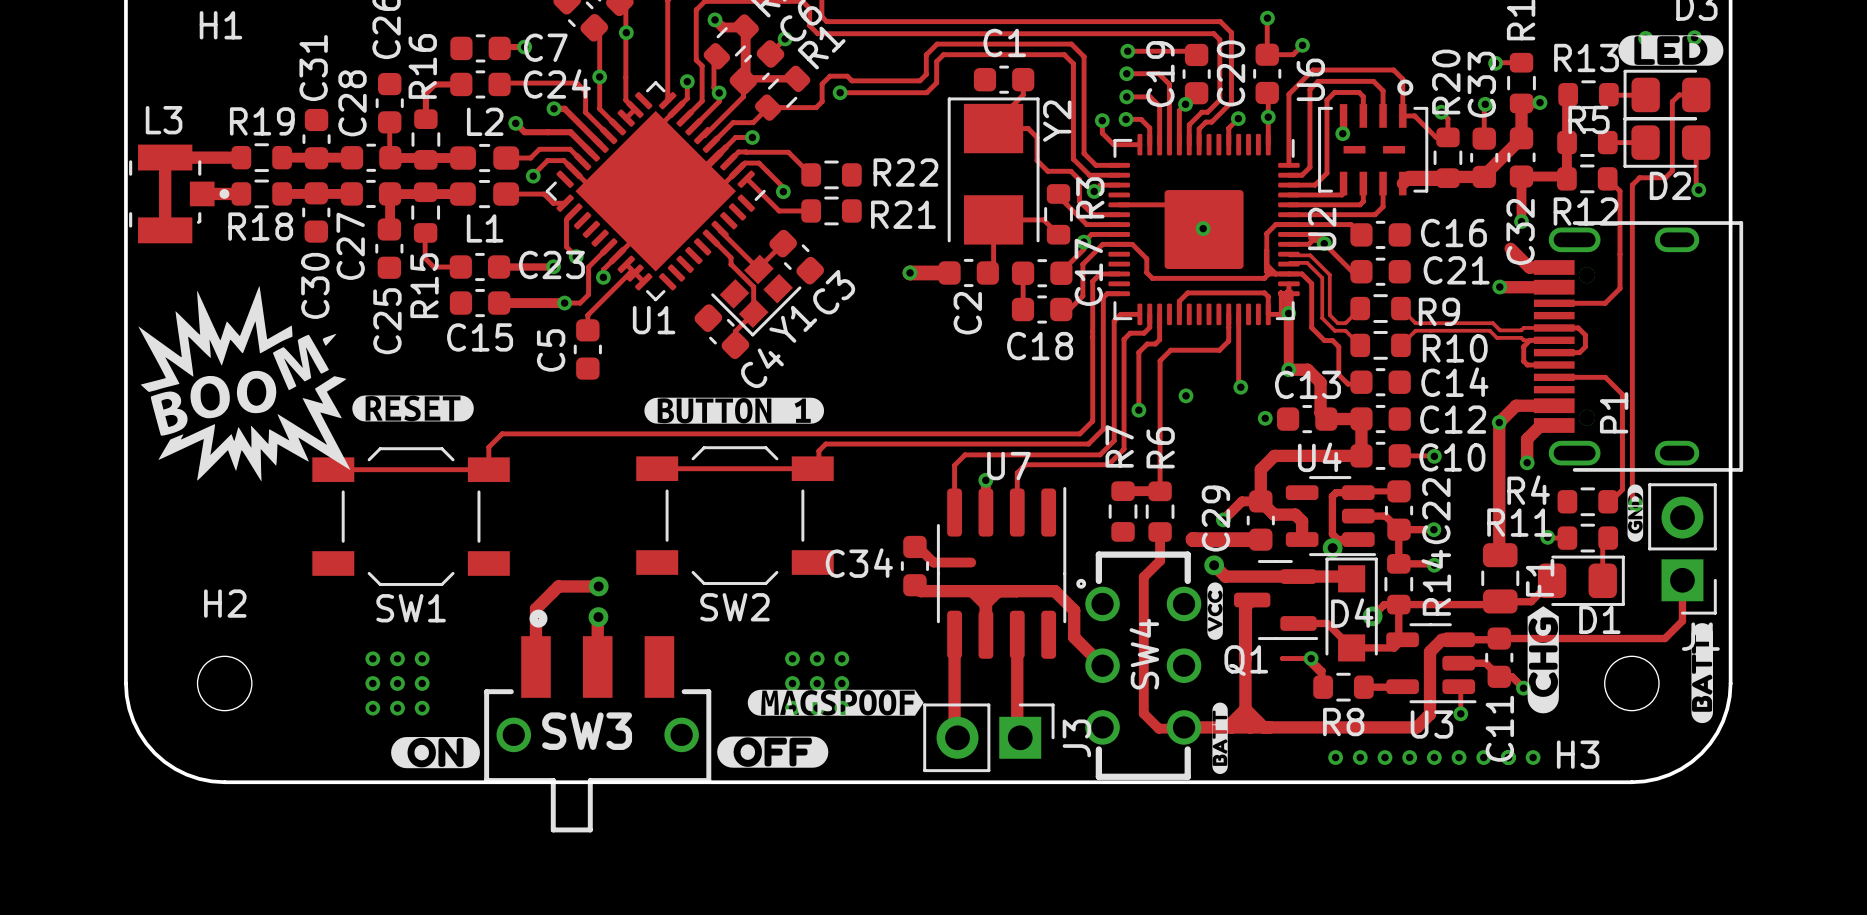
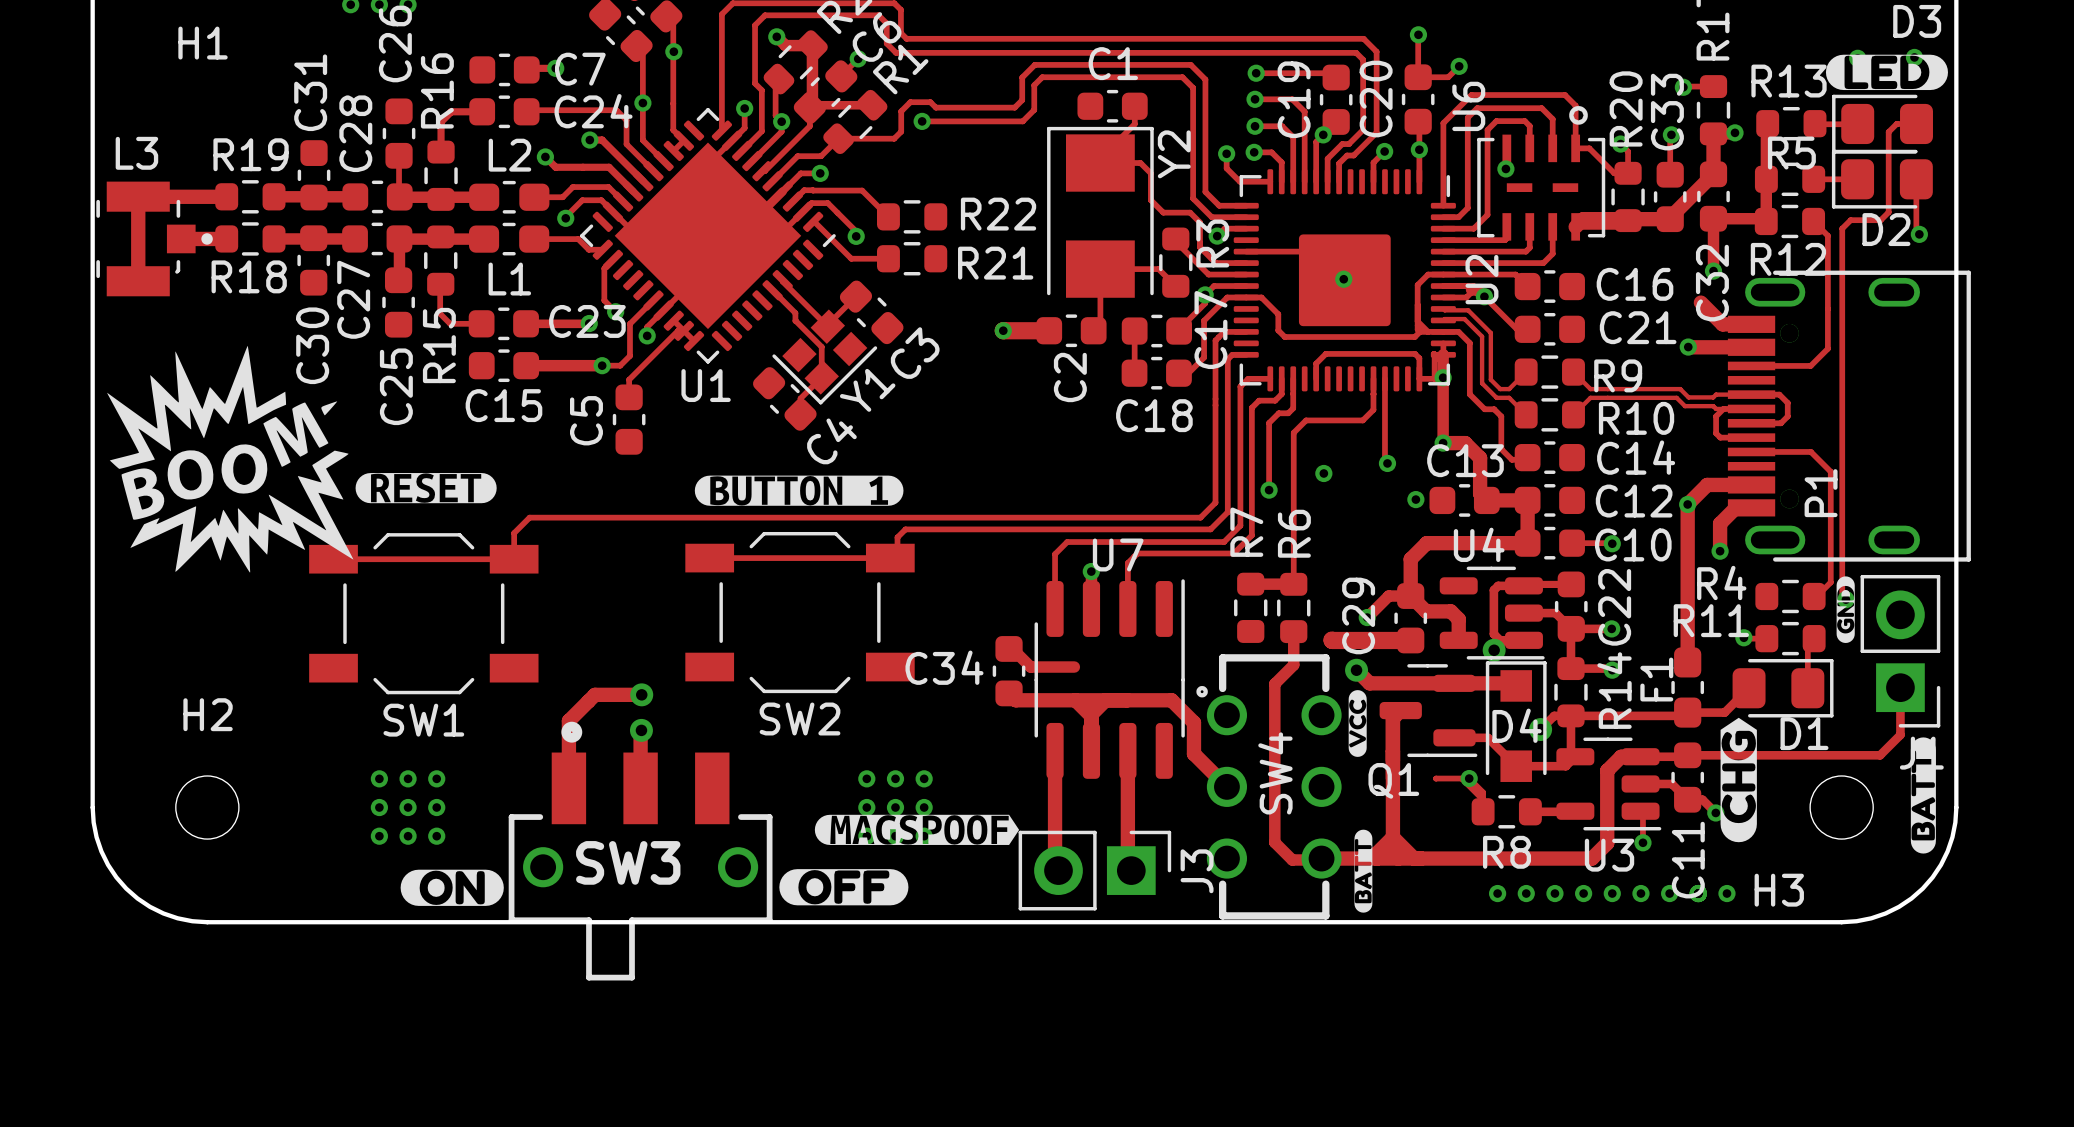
F1 footprint: [1481, 543, 1520, 614] -> [1671, 647, 1705, 728]
F1 name position: F1 (1540, 577) -> F1 (1656, 679)

